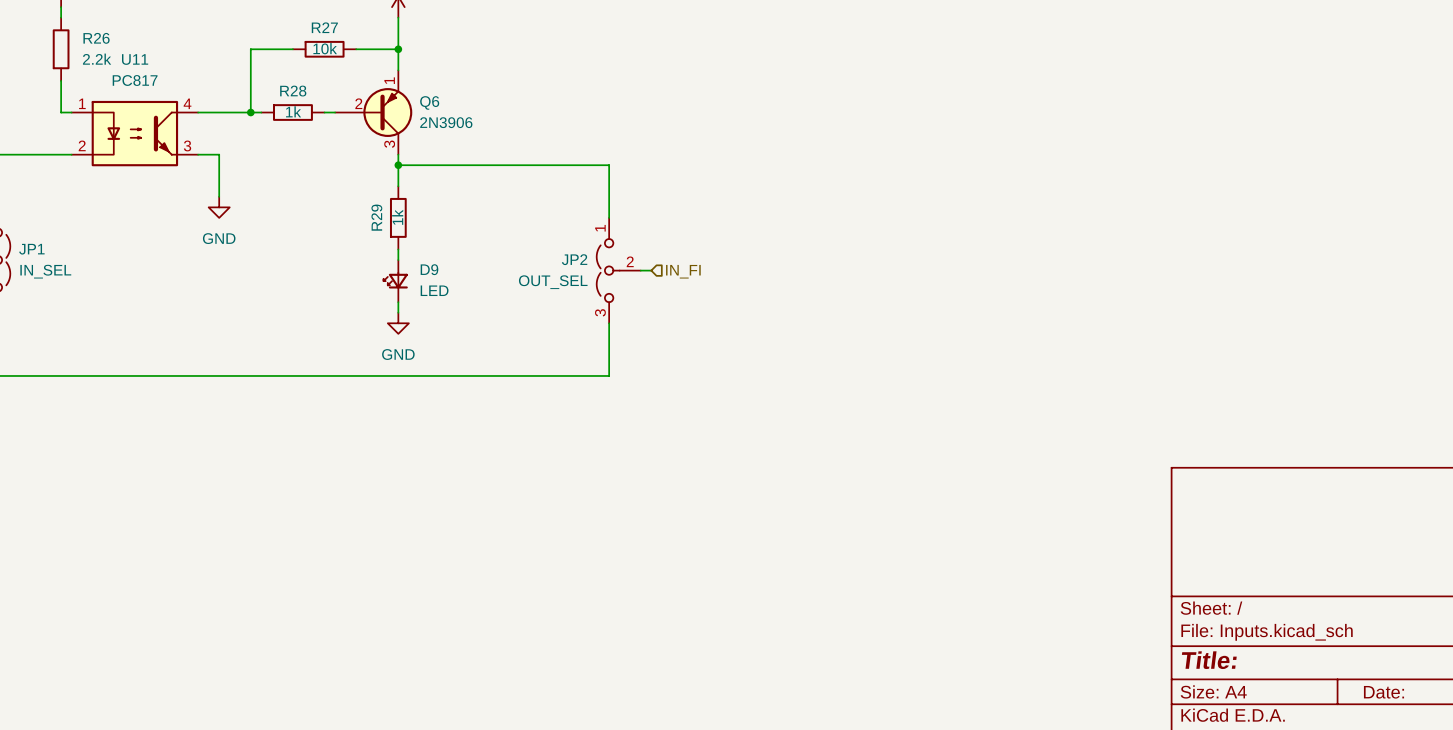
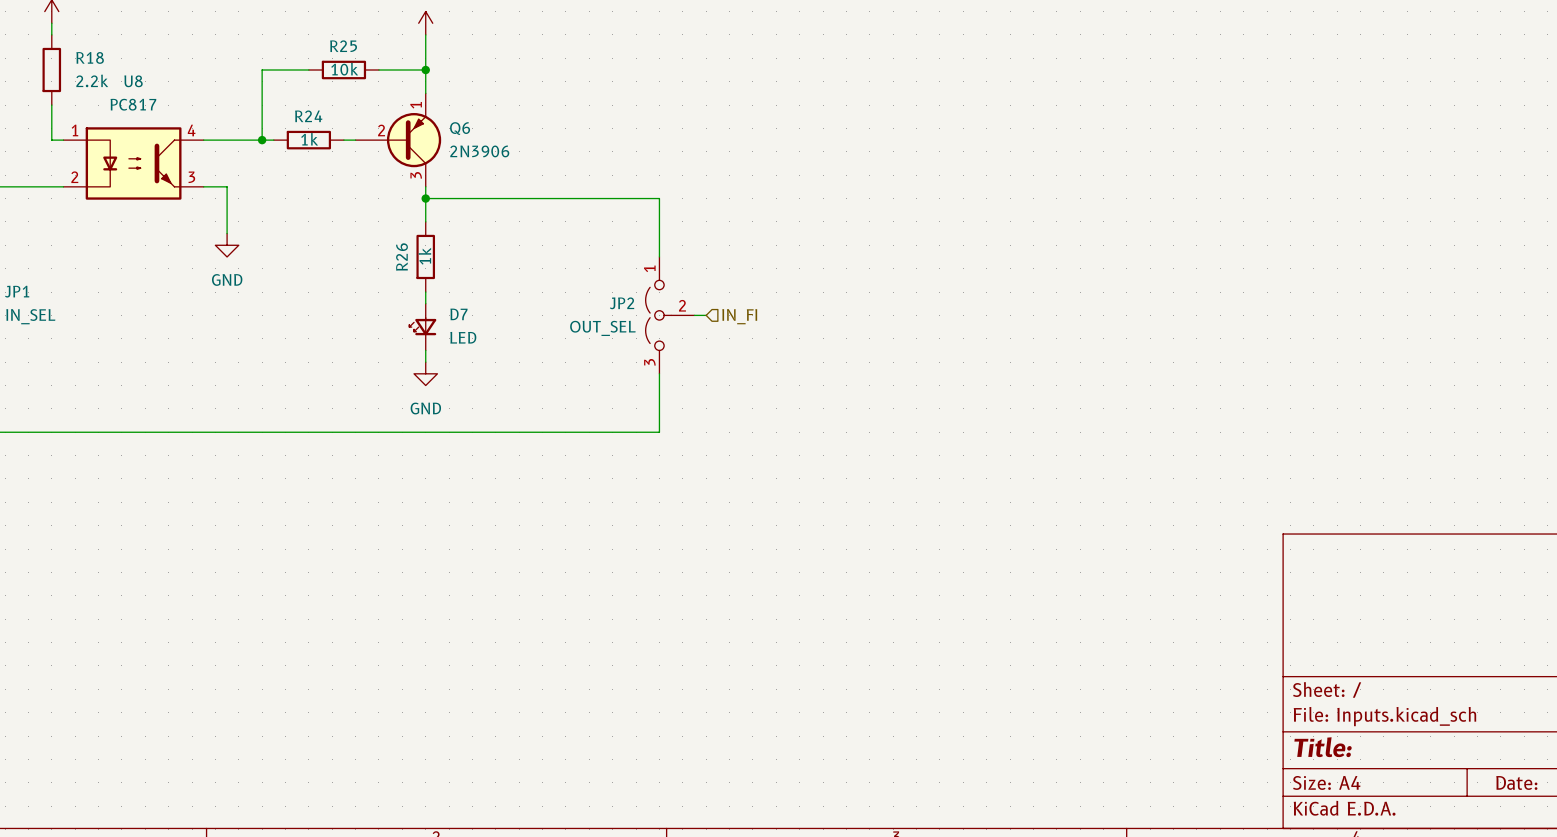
R27 name: R27 (324, 27) -> R25 (343, 46)
R26 name: R26 (96, 38) -> R18 (90, 57)
U11 name: U11 (135, 59) -> U8 (133, 81)
R28 name: R28 (293, 91) -> R24 (308, 116)
R29 name: R29 (376, 217) -> R26 (402, 257)
D9 name: D9 (429, 269) -> D7 (458, 314)

